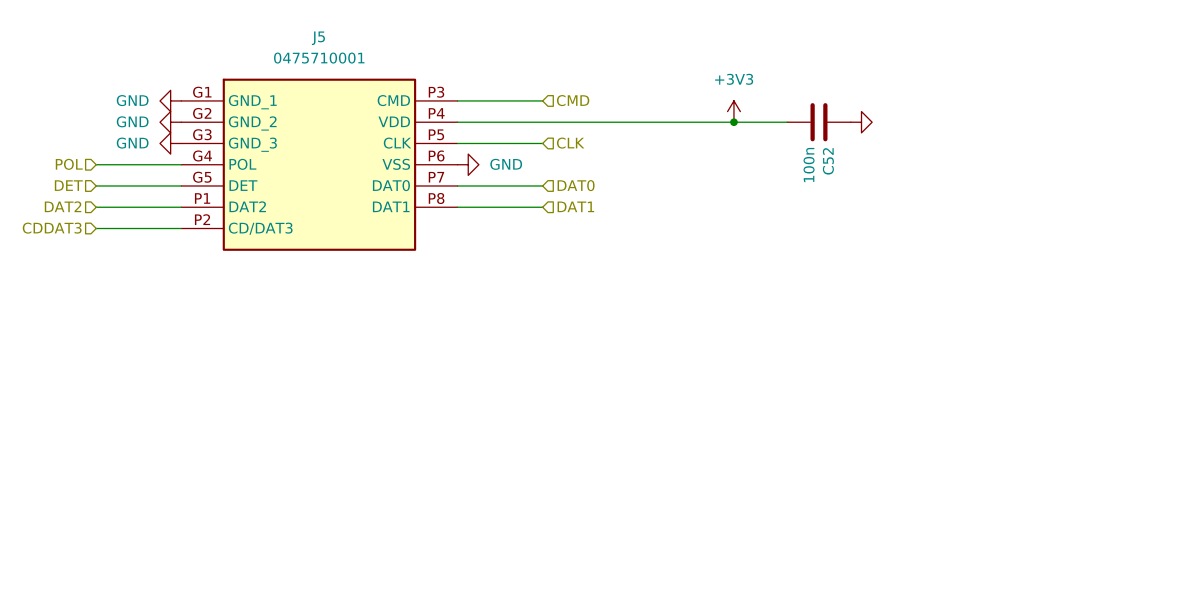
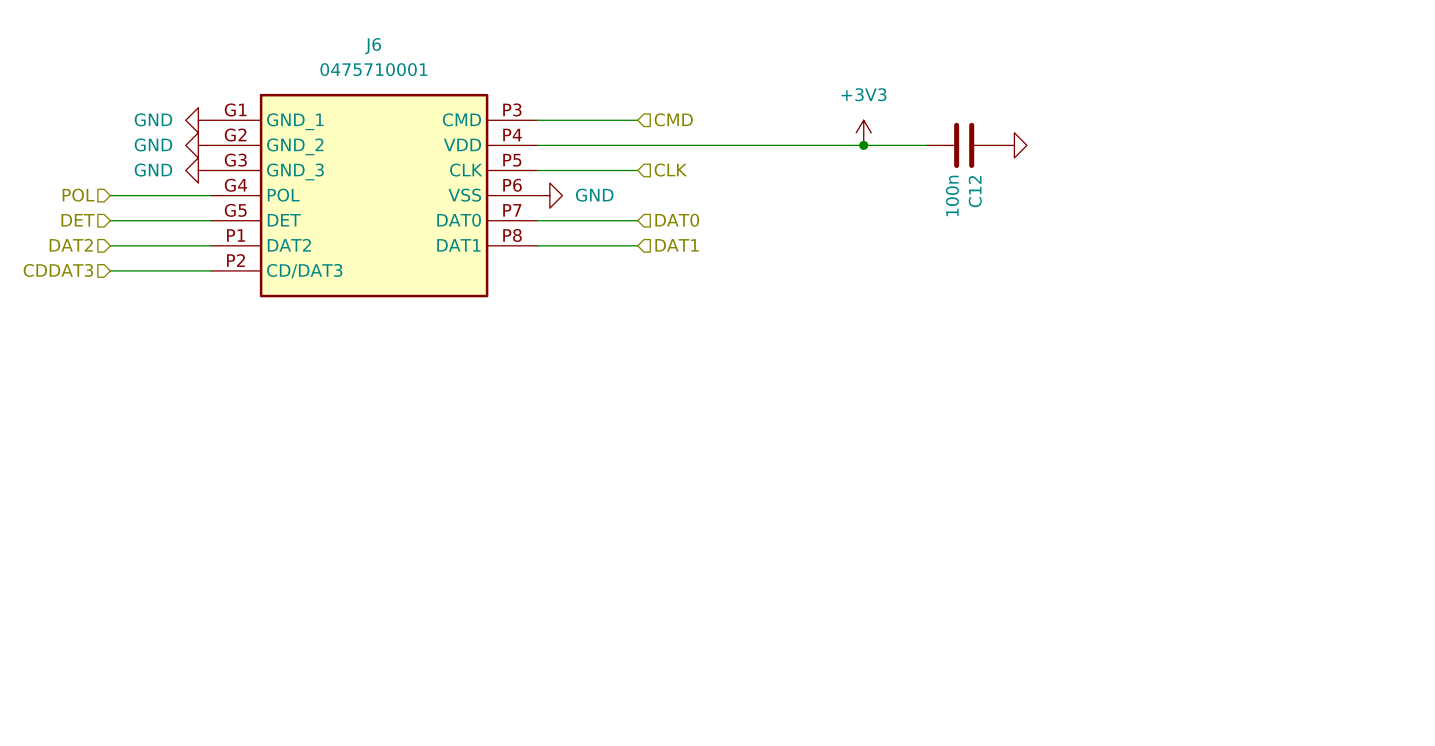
J5 name: J5 (318, 38) -> J6 (373, 46)
C52 name: C52 (828, 161) -> C12 (975, 191)

